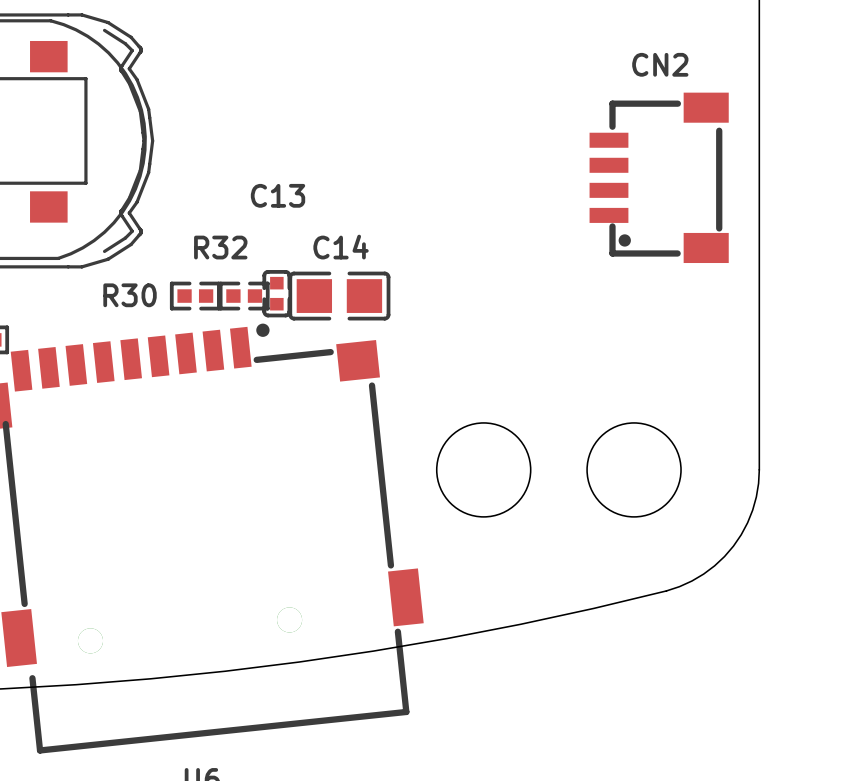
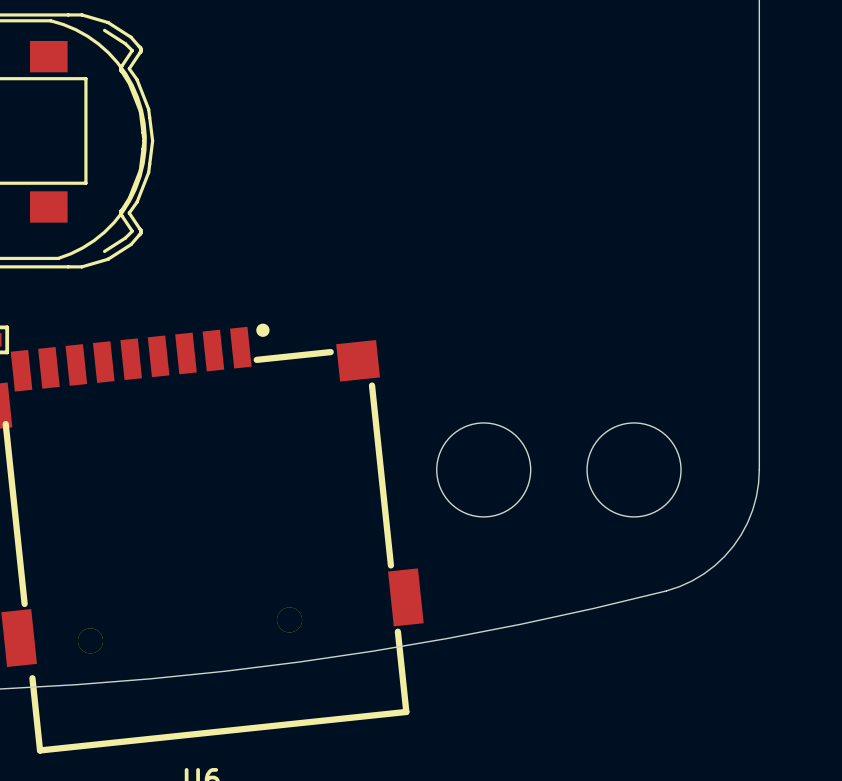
CN2: (659, 177) -> none
C13: (276, 293) -> none
R30: (195, 296) -> none
R32: (244, 296) -> none
C14: (339, 296) -> none

